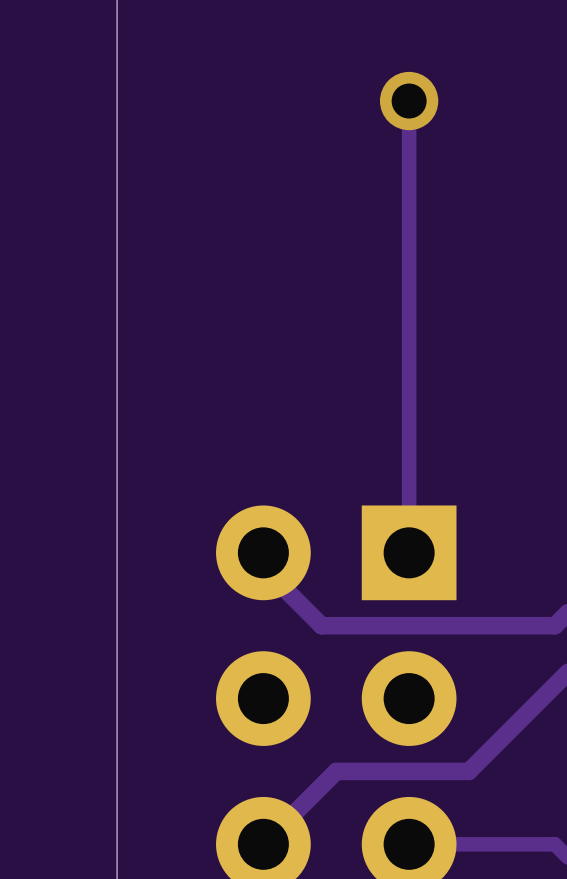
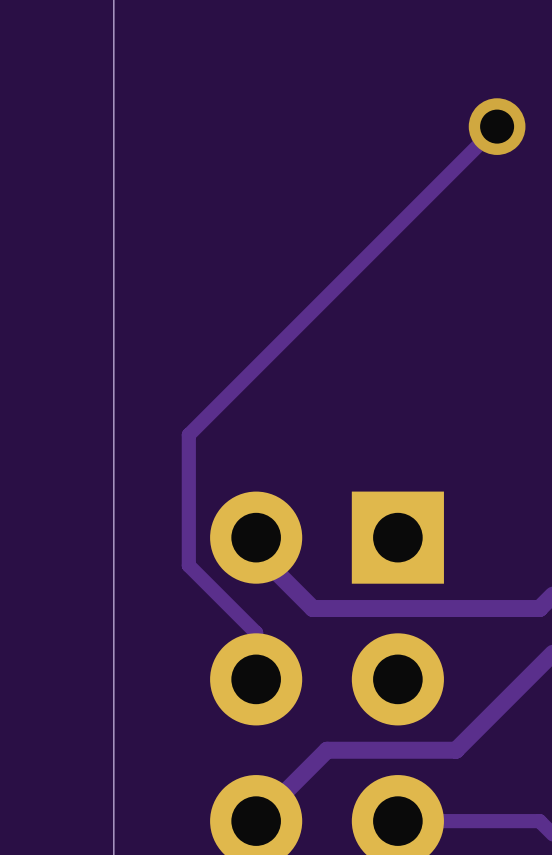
track: (409, 101) (409, 552) -> none
via position: (409, 101) -> (497, 126)
track: none -> (497, 126) (188, 434) (188, 565) (256, 632) (256, 679)

